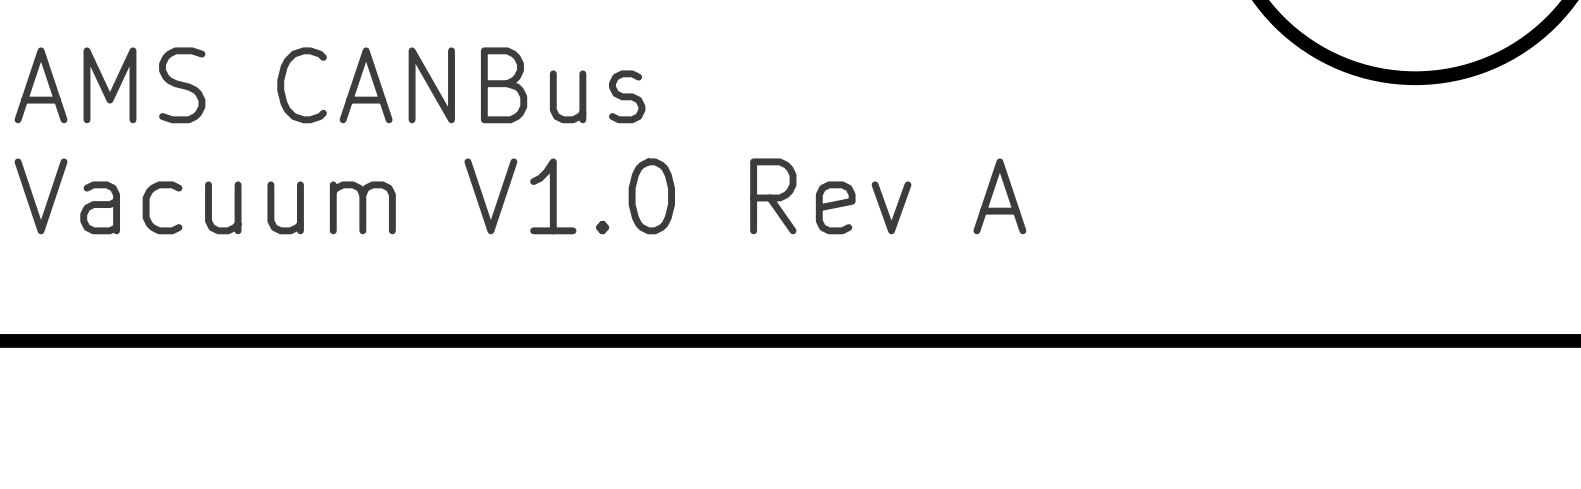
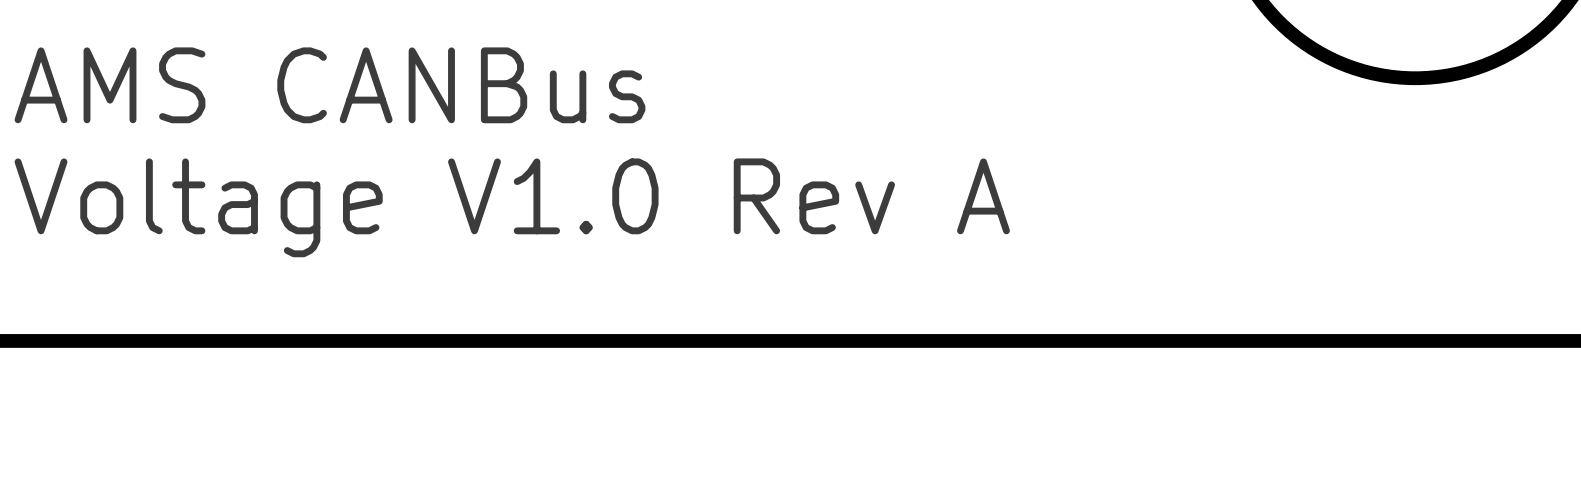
text: Vacuum V1.0 Rev A (520, 196) -> Voltage V1.0 Rev A (512, 207)

